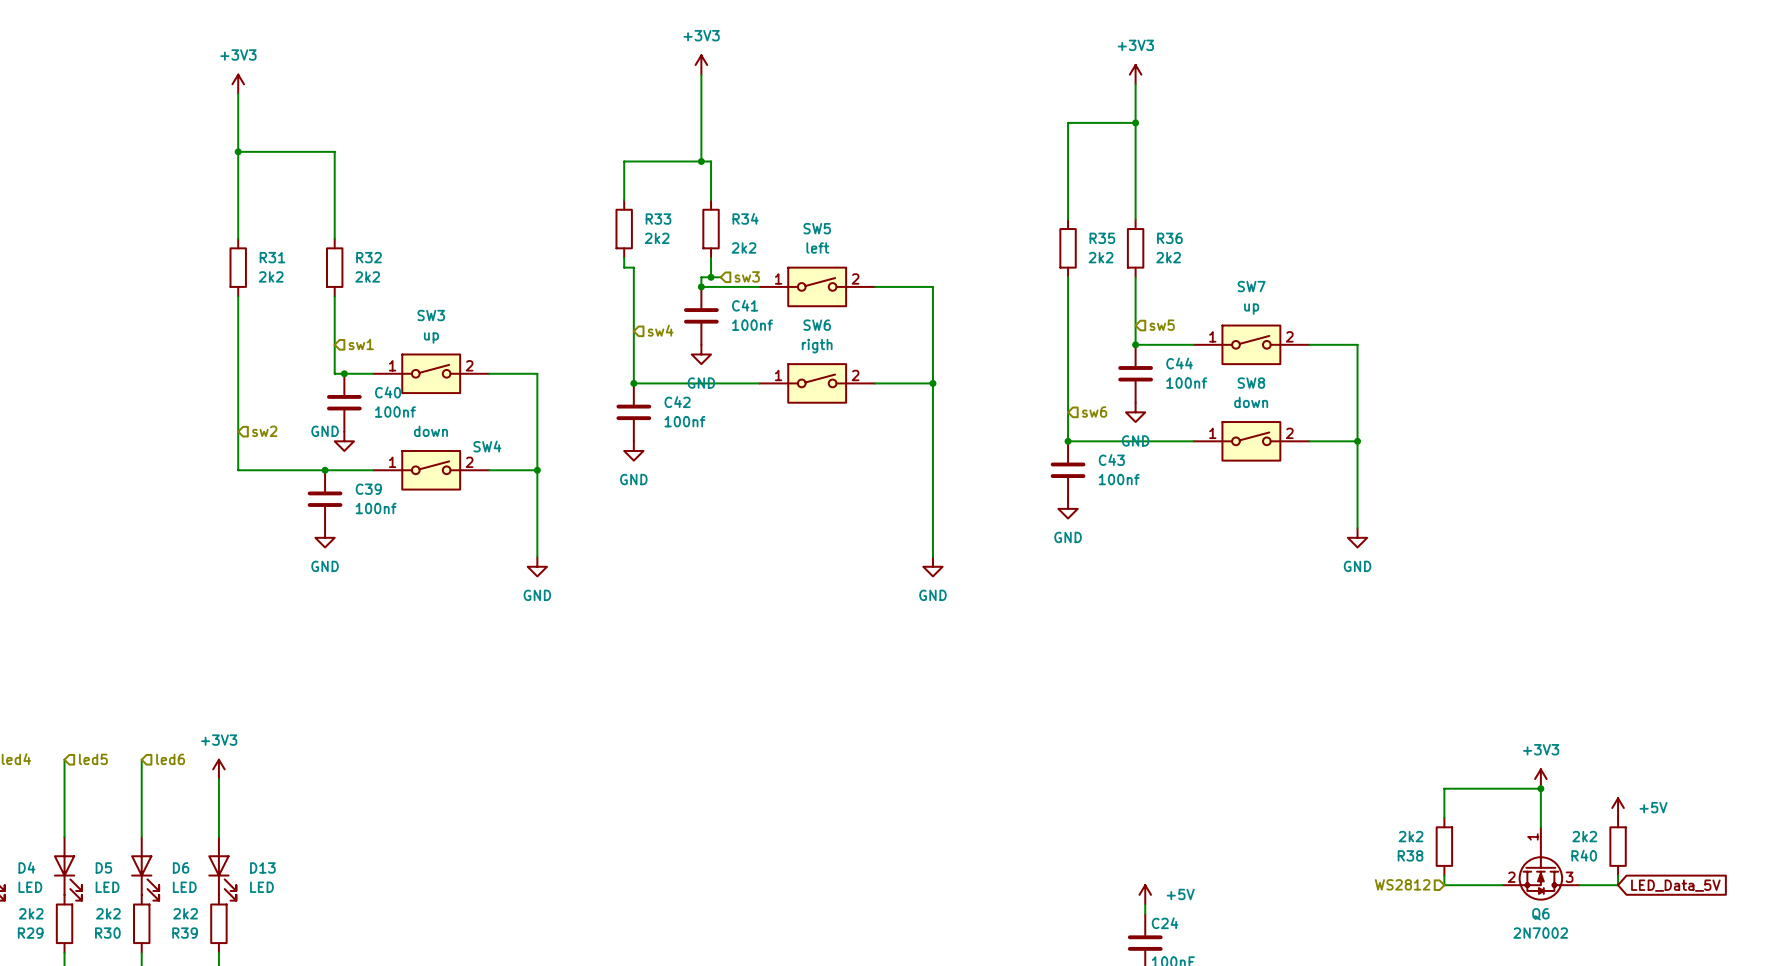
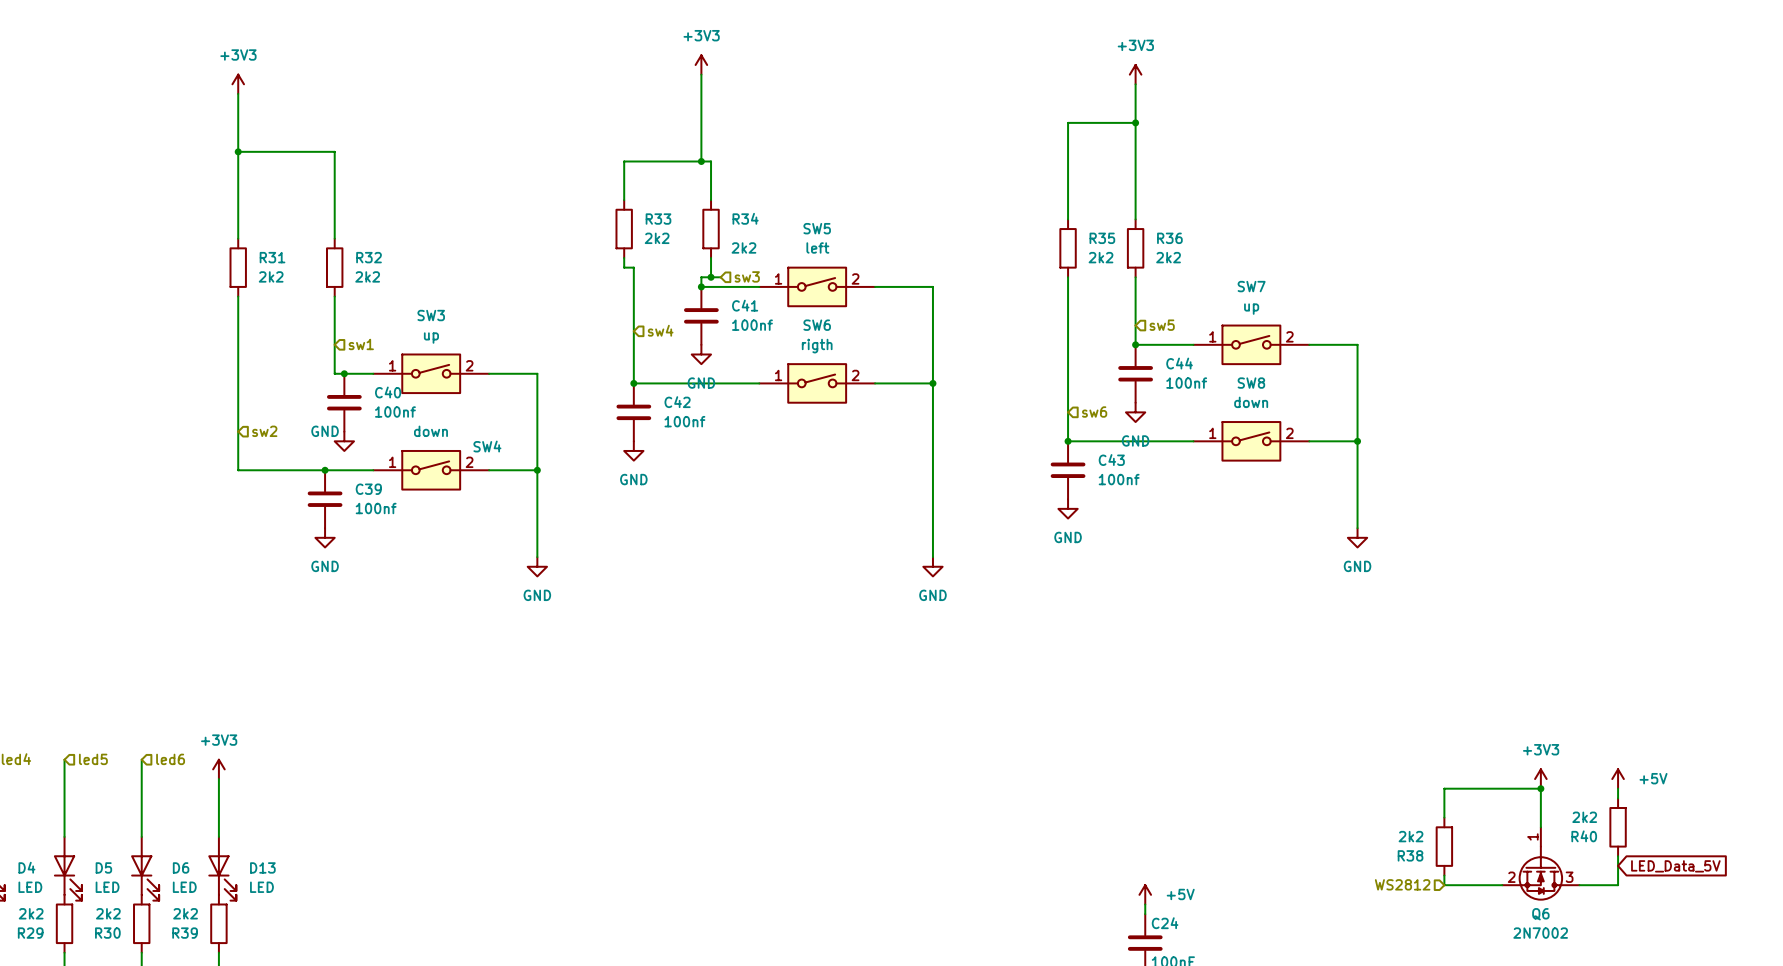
wire: none -> (1618, 788) (1618, 798)
power symbol position: +5V (1618, 807) -> +5V (1618, 779)
R40 position: (1618, 846) -> (1618, 827)
global label position: LED_Data_5V (1675, 885) -> LED_Data_5V (1675, 866)

